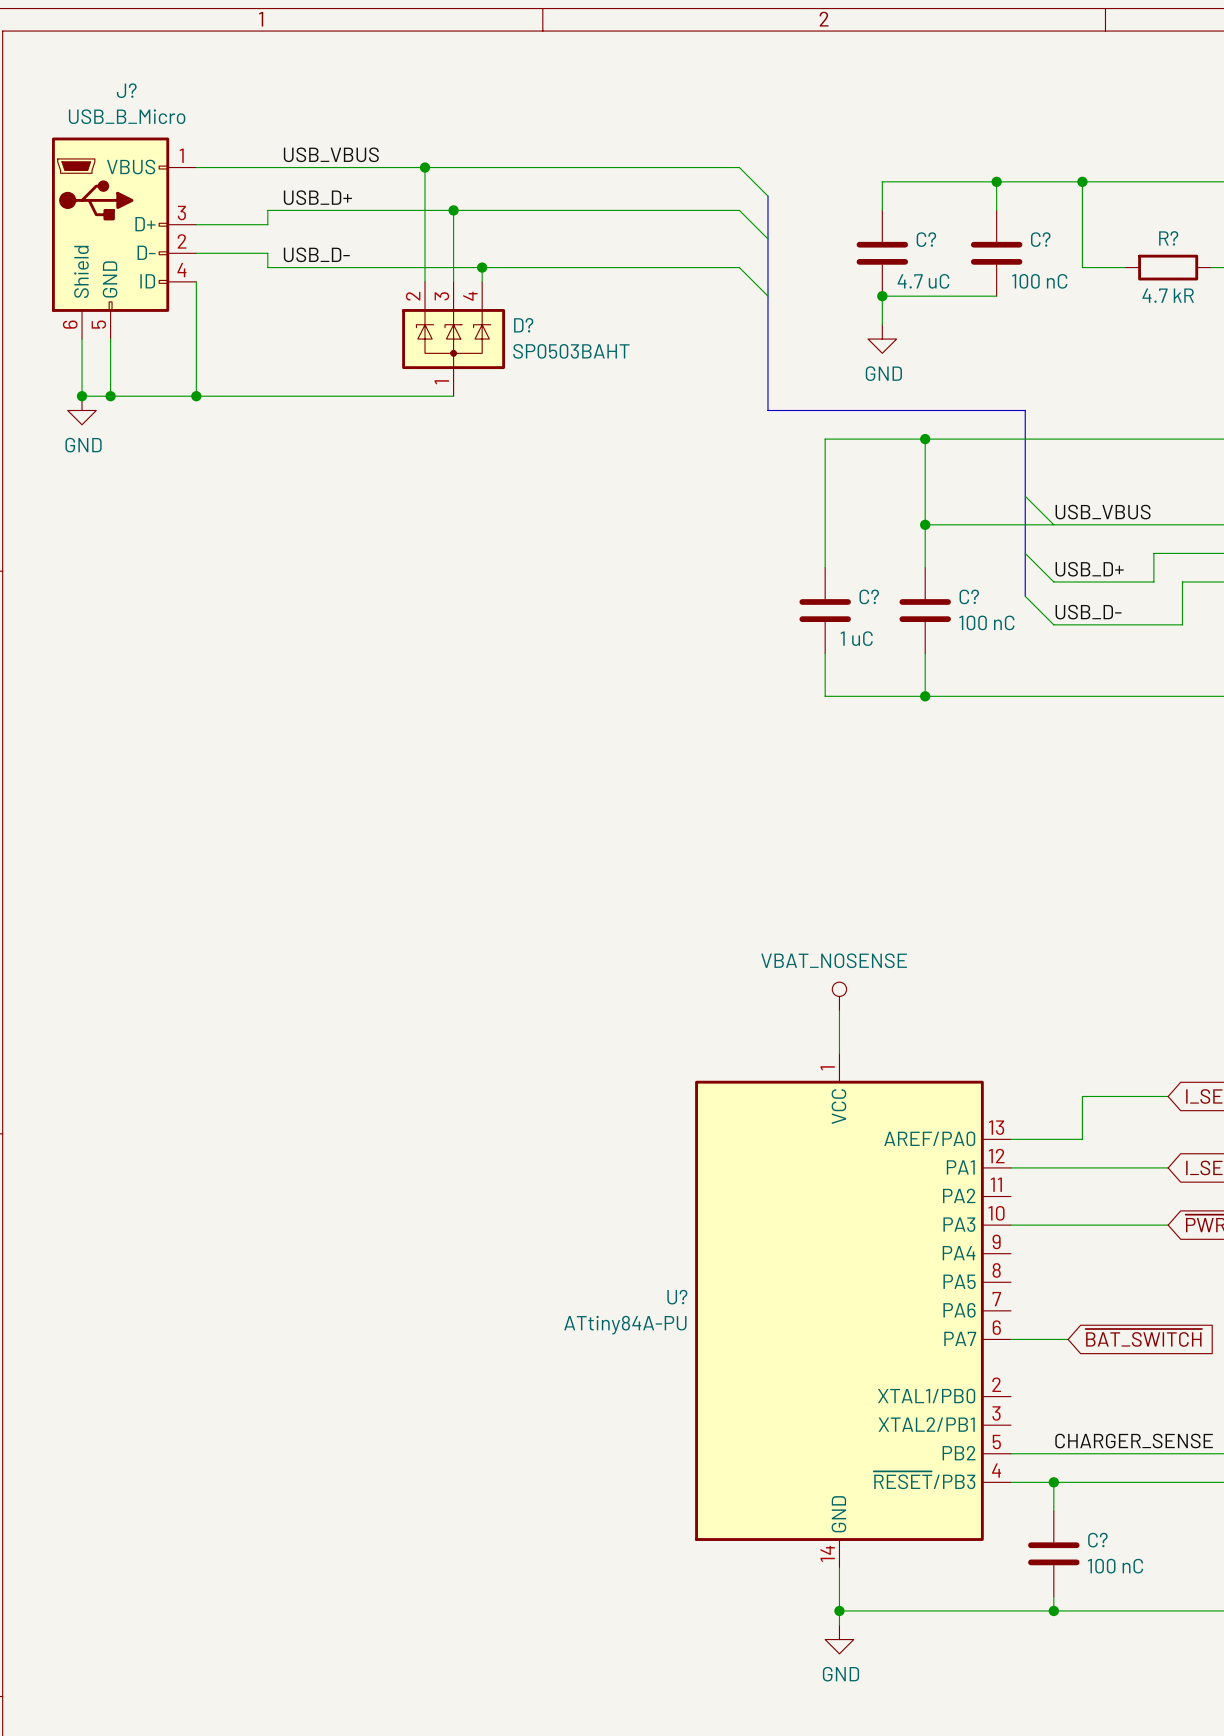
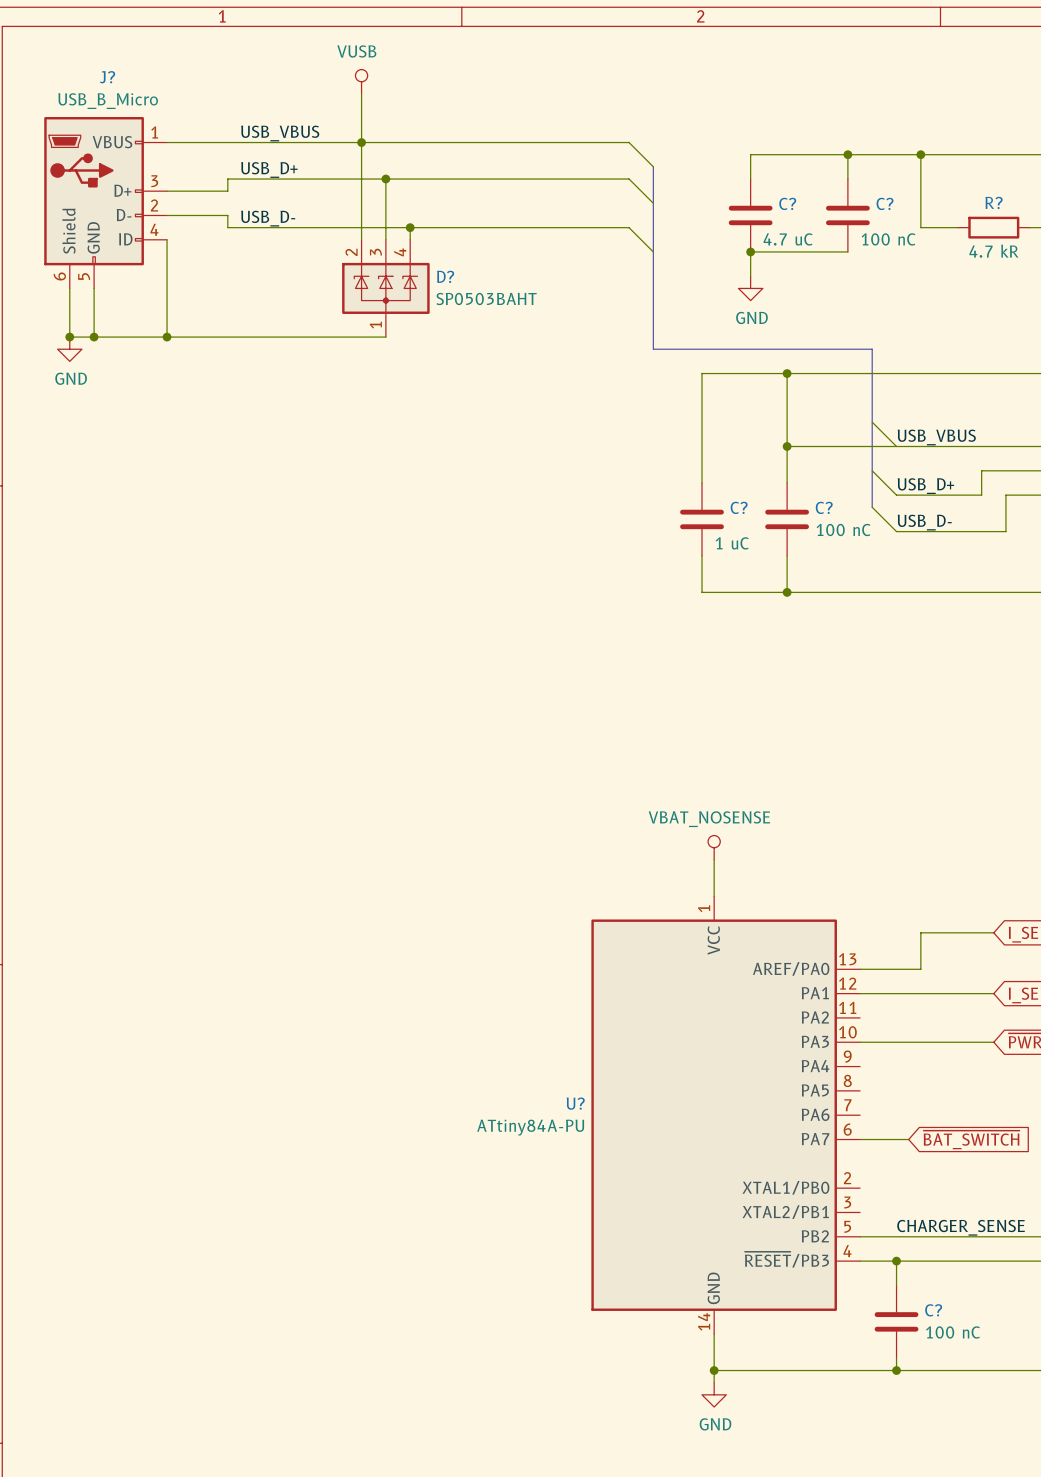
power symbol: none -> VUSB (361, 81)
wire: none -> (361, 93) (361, 142)

